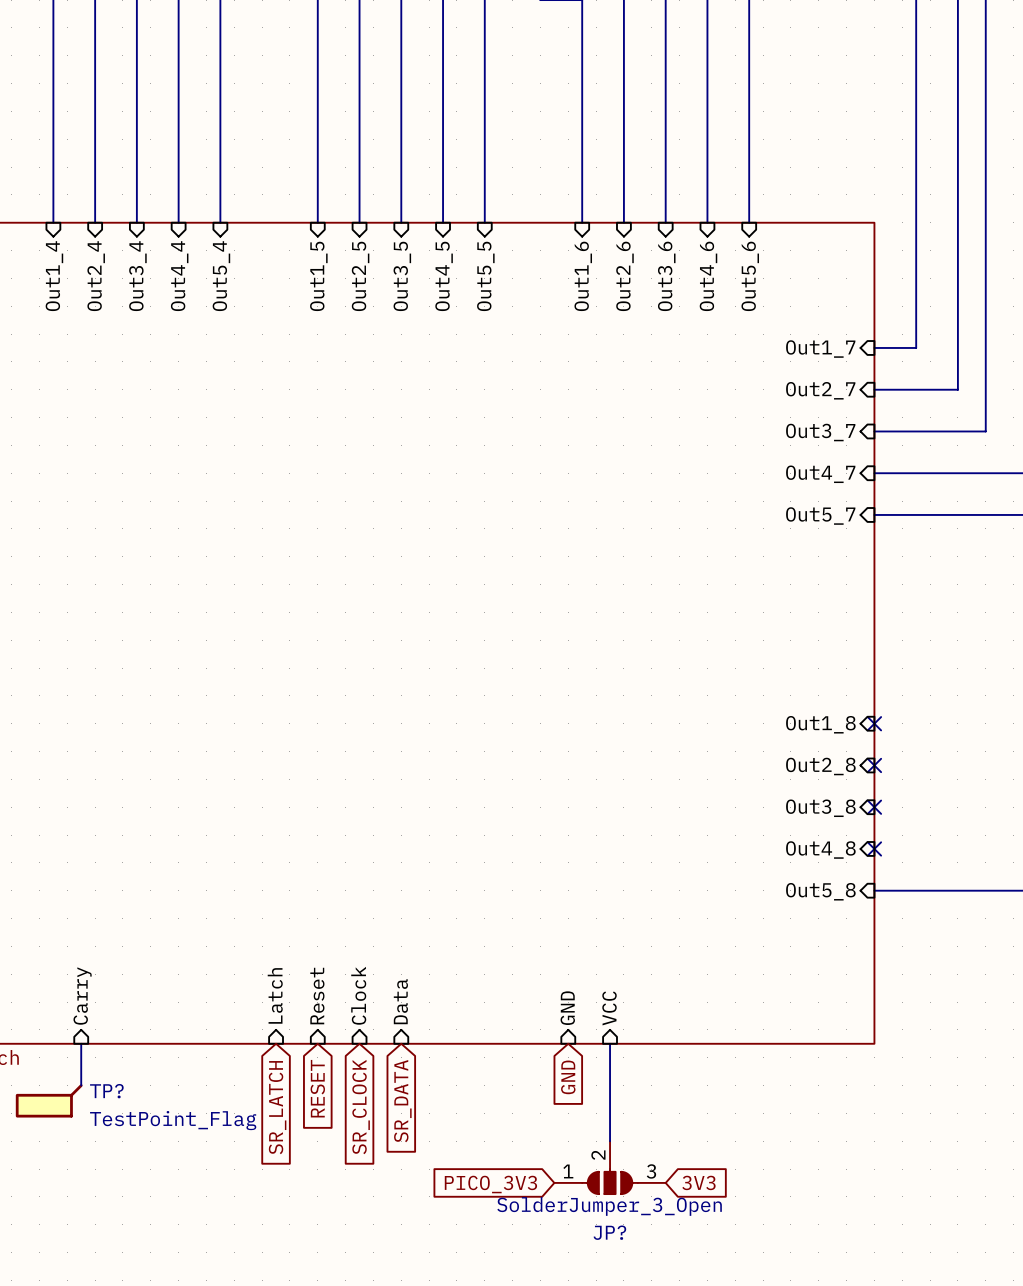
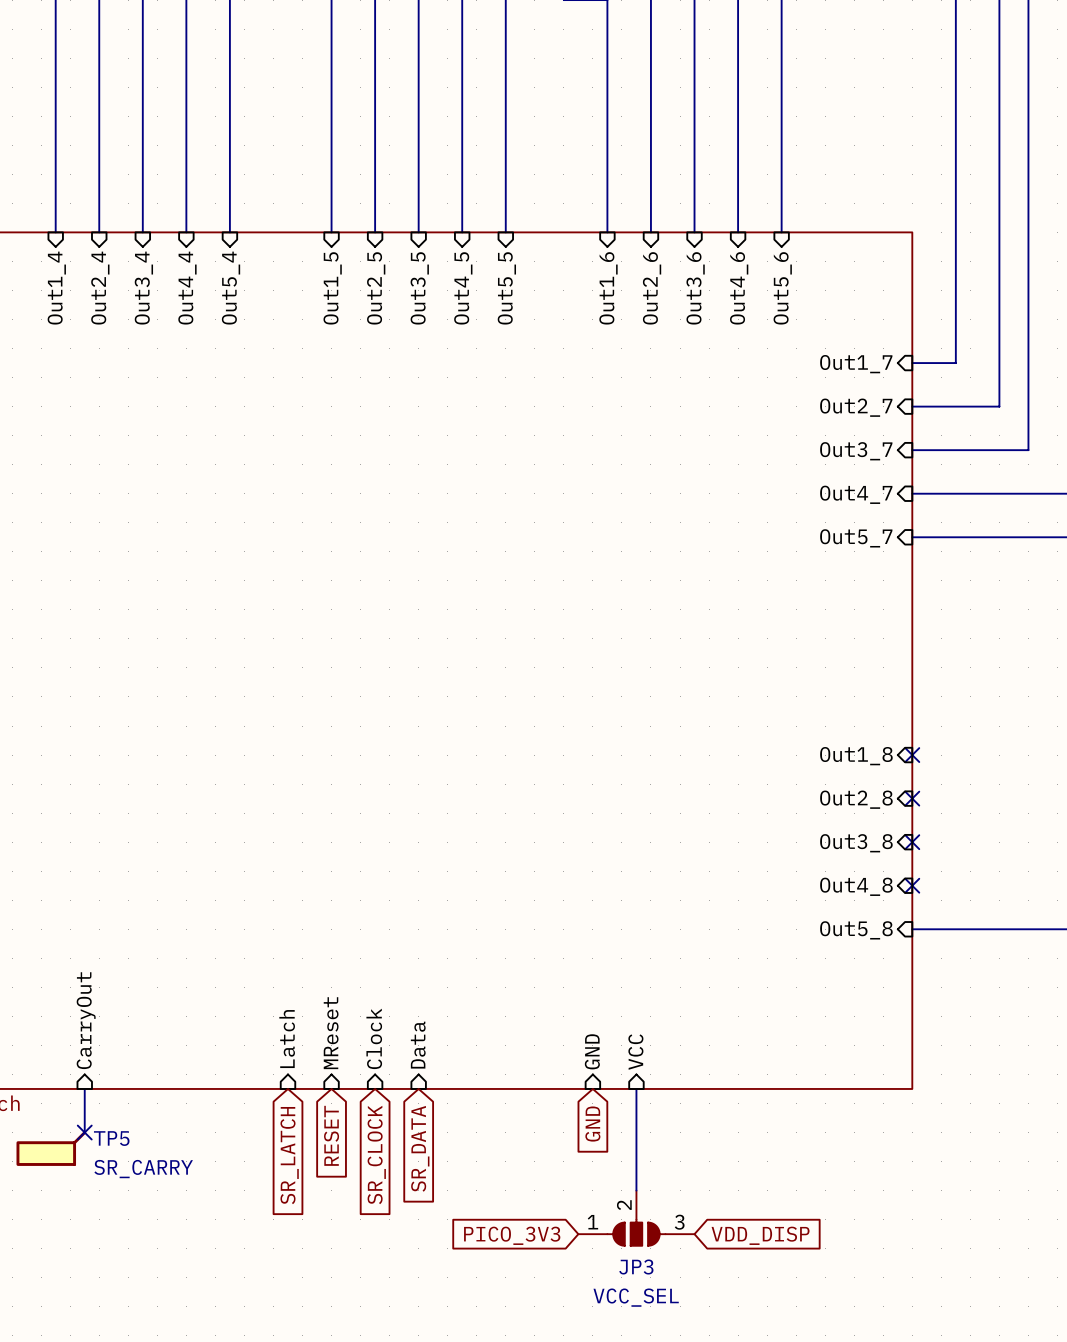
sheet pin: Carry (82, 996) -> CarryOut (86, 1020)
sheet pin: Reset (317, 996) -> MReset (331, 1033)
no-connect mark: none -> (84, 1132)
TP? name: TP? (106, 1091) -> TP5 (111, 1138)
TP? value: TestPoint_Flag (173, 1120) -> SR_CARRY (143, 1169)
global label: 3V3 (698, 1182) -> VDD_DISP (760, 1235)
JP? value: SolderJumper_3_Open (609, 1206) -> VCC_SEL (636, 1297)
JP? name: JP? (609, 1232) -> JP3 (636, 1267)

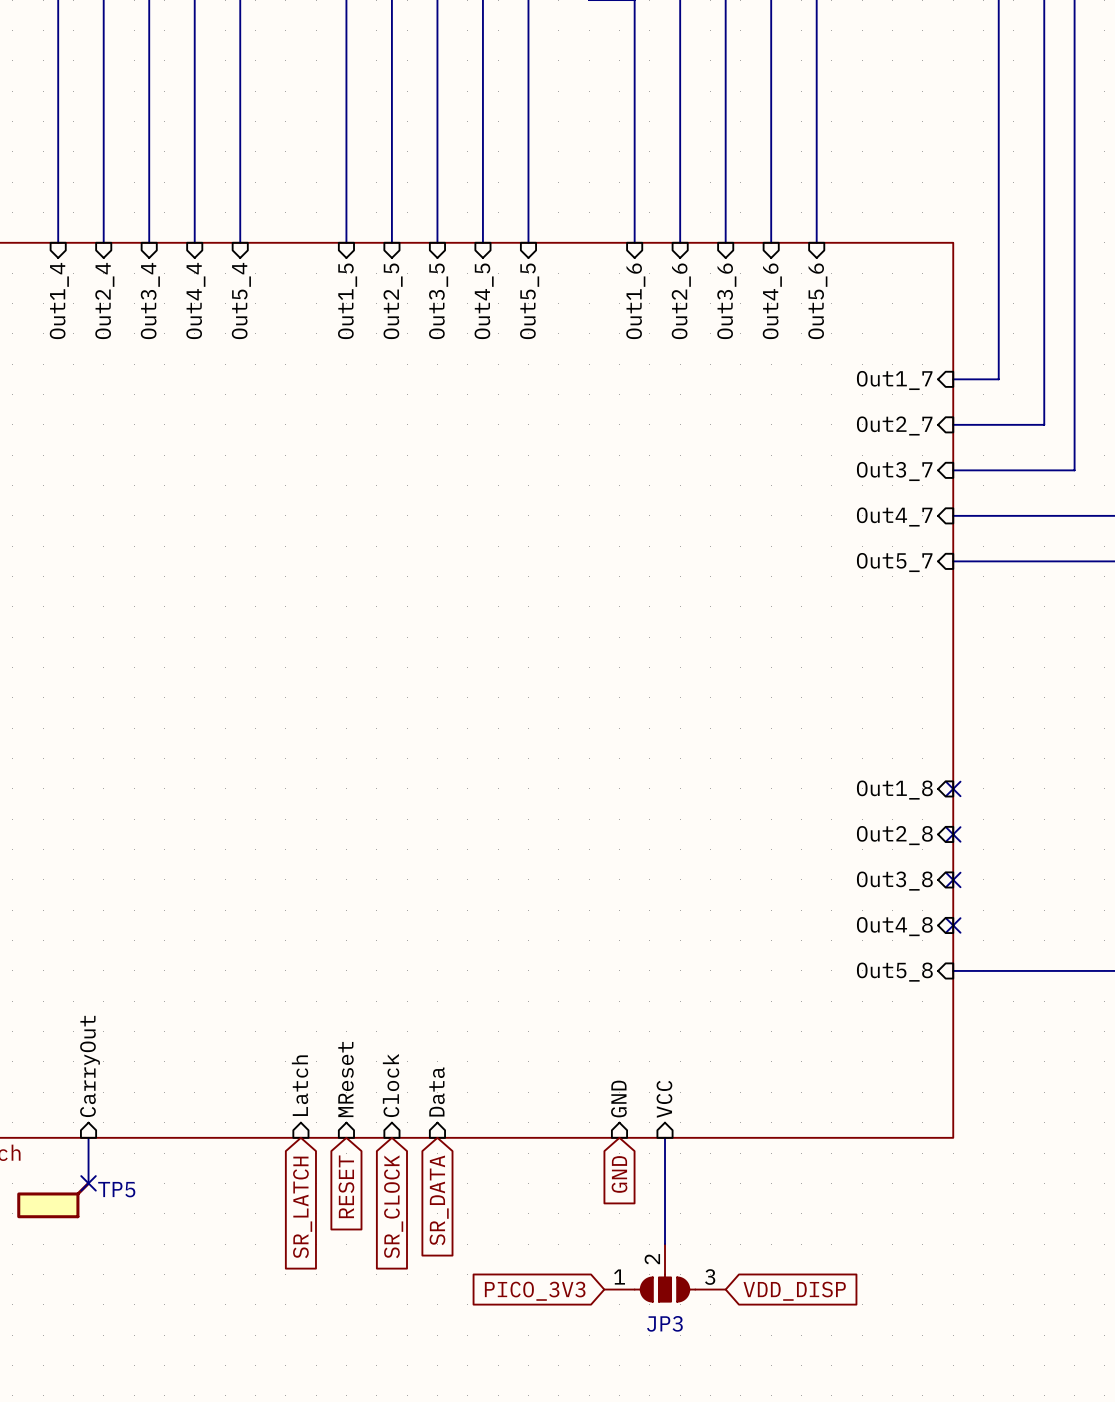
TP5 value: SR_CARRY (143, 1169) -> none
JP3 value: VCC_SEL (636, 1297) -> none

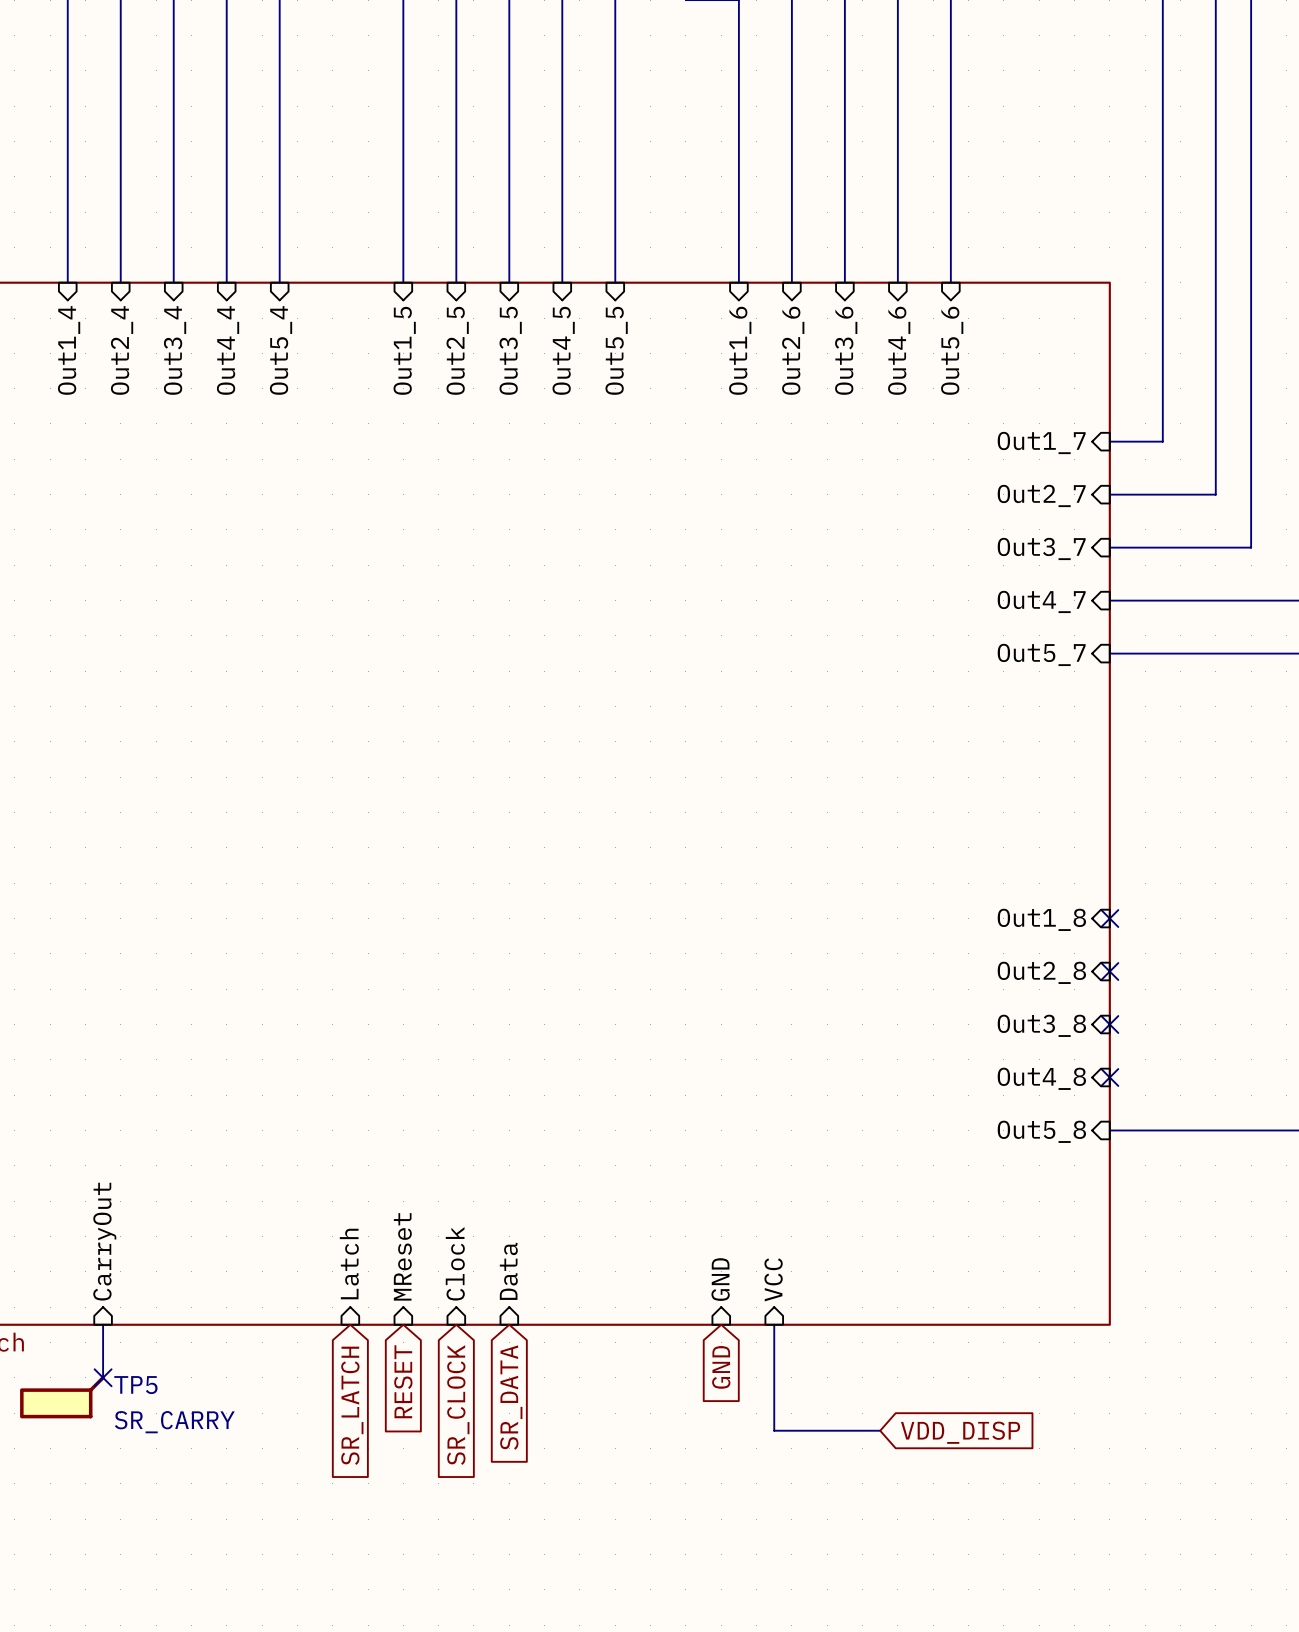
TP5 value: none -> SR_CARRY (174, 1422)
wire: (665, 1228) (665, 1244) -> (774, 1430) (880, 1430)
JP3: (665, 1272) -> none
global label: PICO_3V3 (535, 1291) -> none
global label position: VDD_DISP (794, 1291) -> VDD_DISP (960, 1432)

